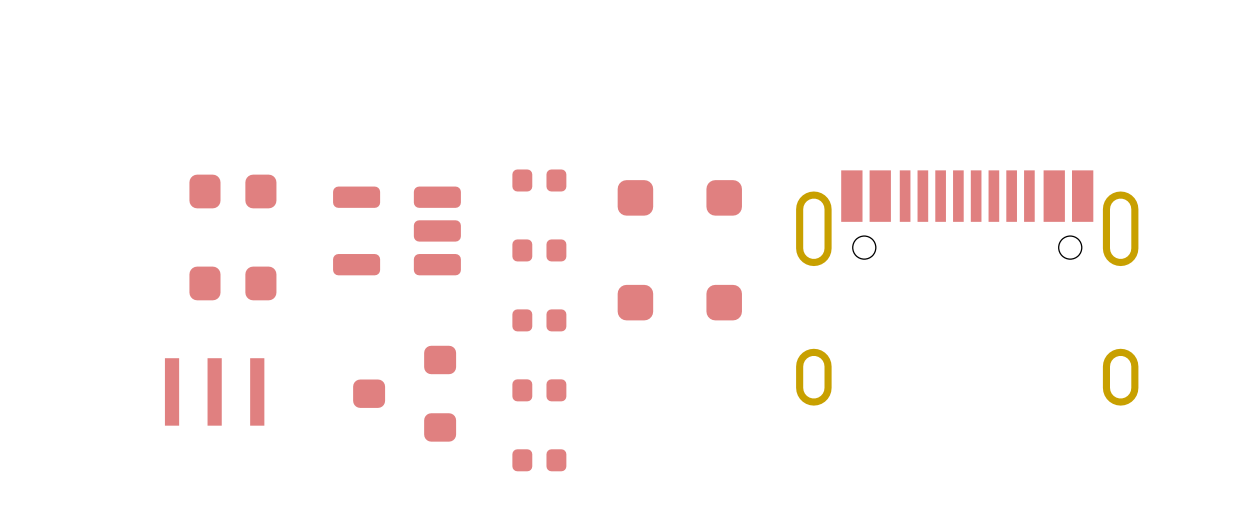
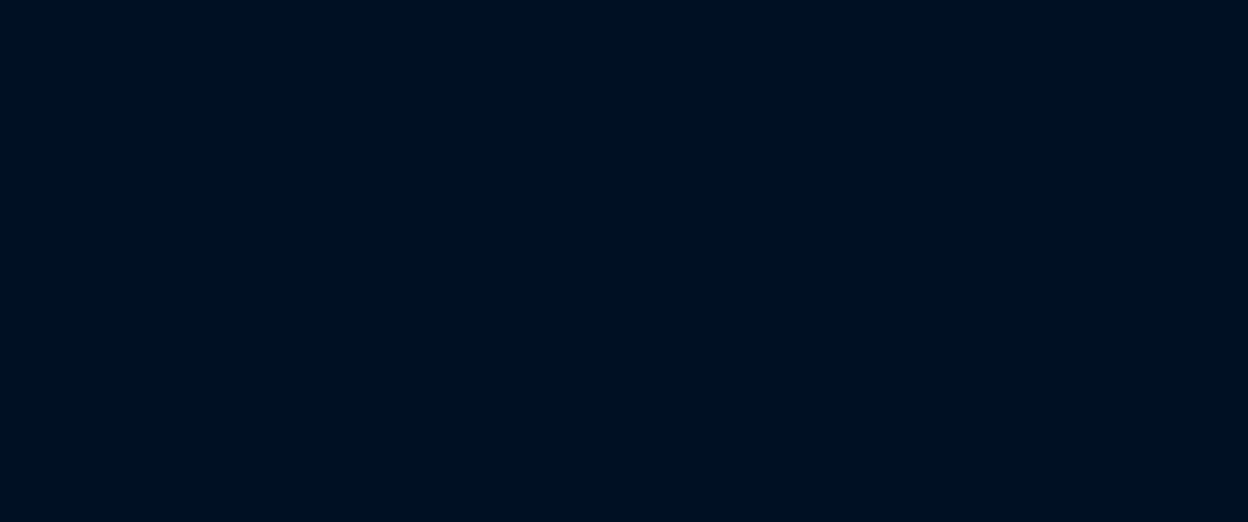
part: (539, 180) -> none
part: (232, 191) -> none
part: (679, 197) -> none
part: (396, 230) -> none
part: (539, 250) -> none
part: (232, 283) -> none
part: (967, 287) -> none
part: (679, 302) -> none
part: (539, 320) -> none
part: (539, 390) -> none
part: (214, 391) -> none
part: (404, 393) -> none
part: (539, 460) -> none

